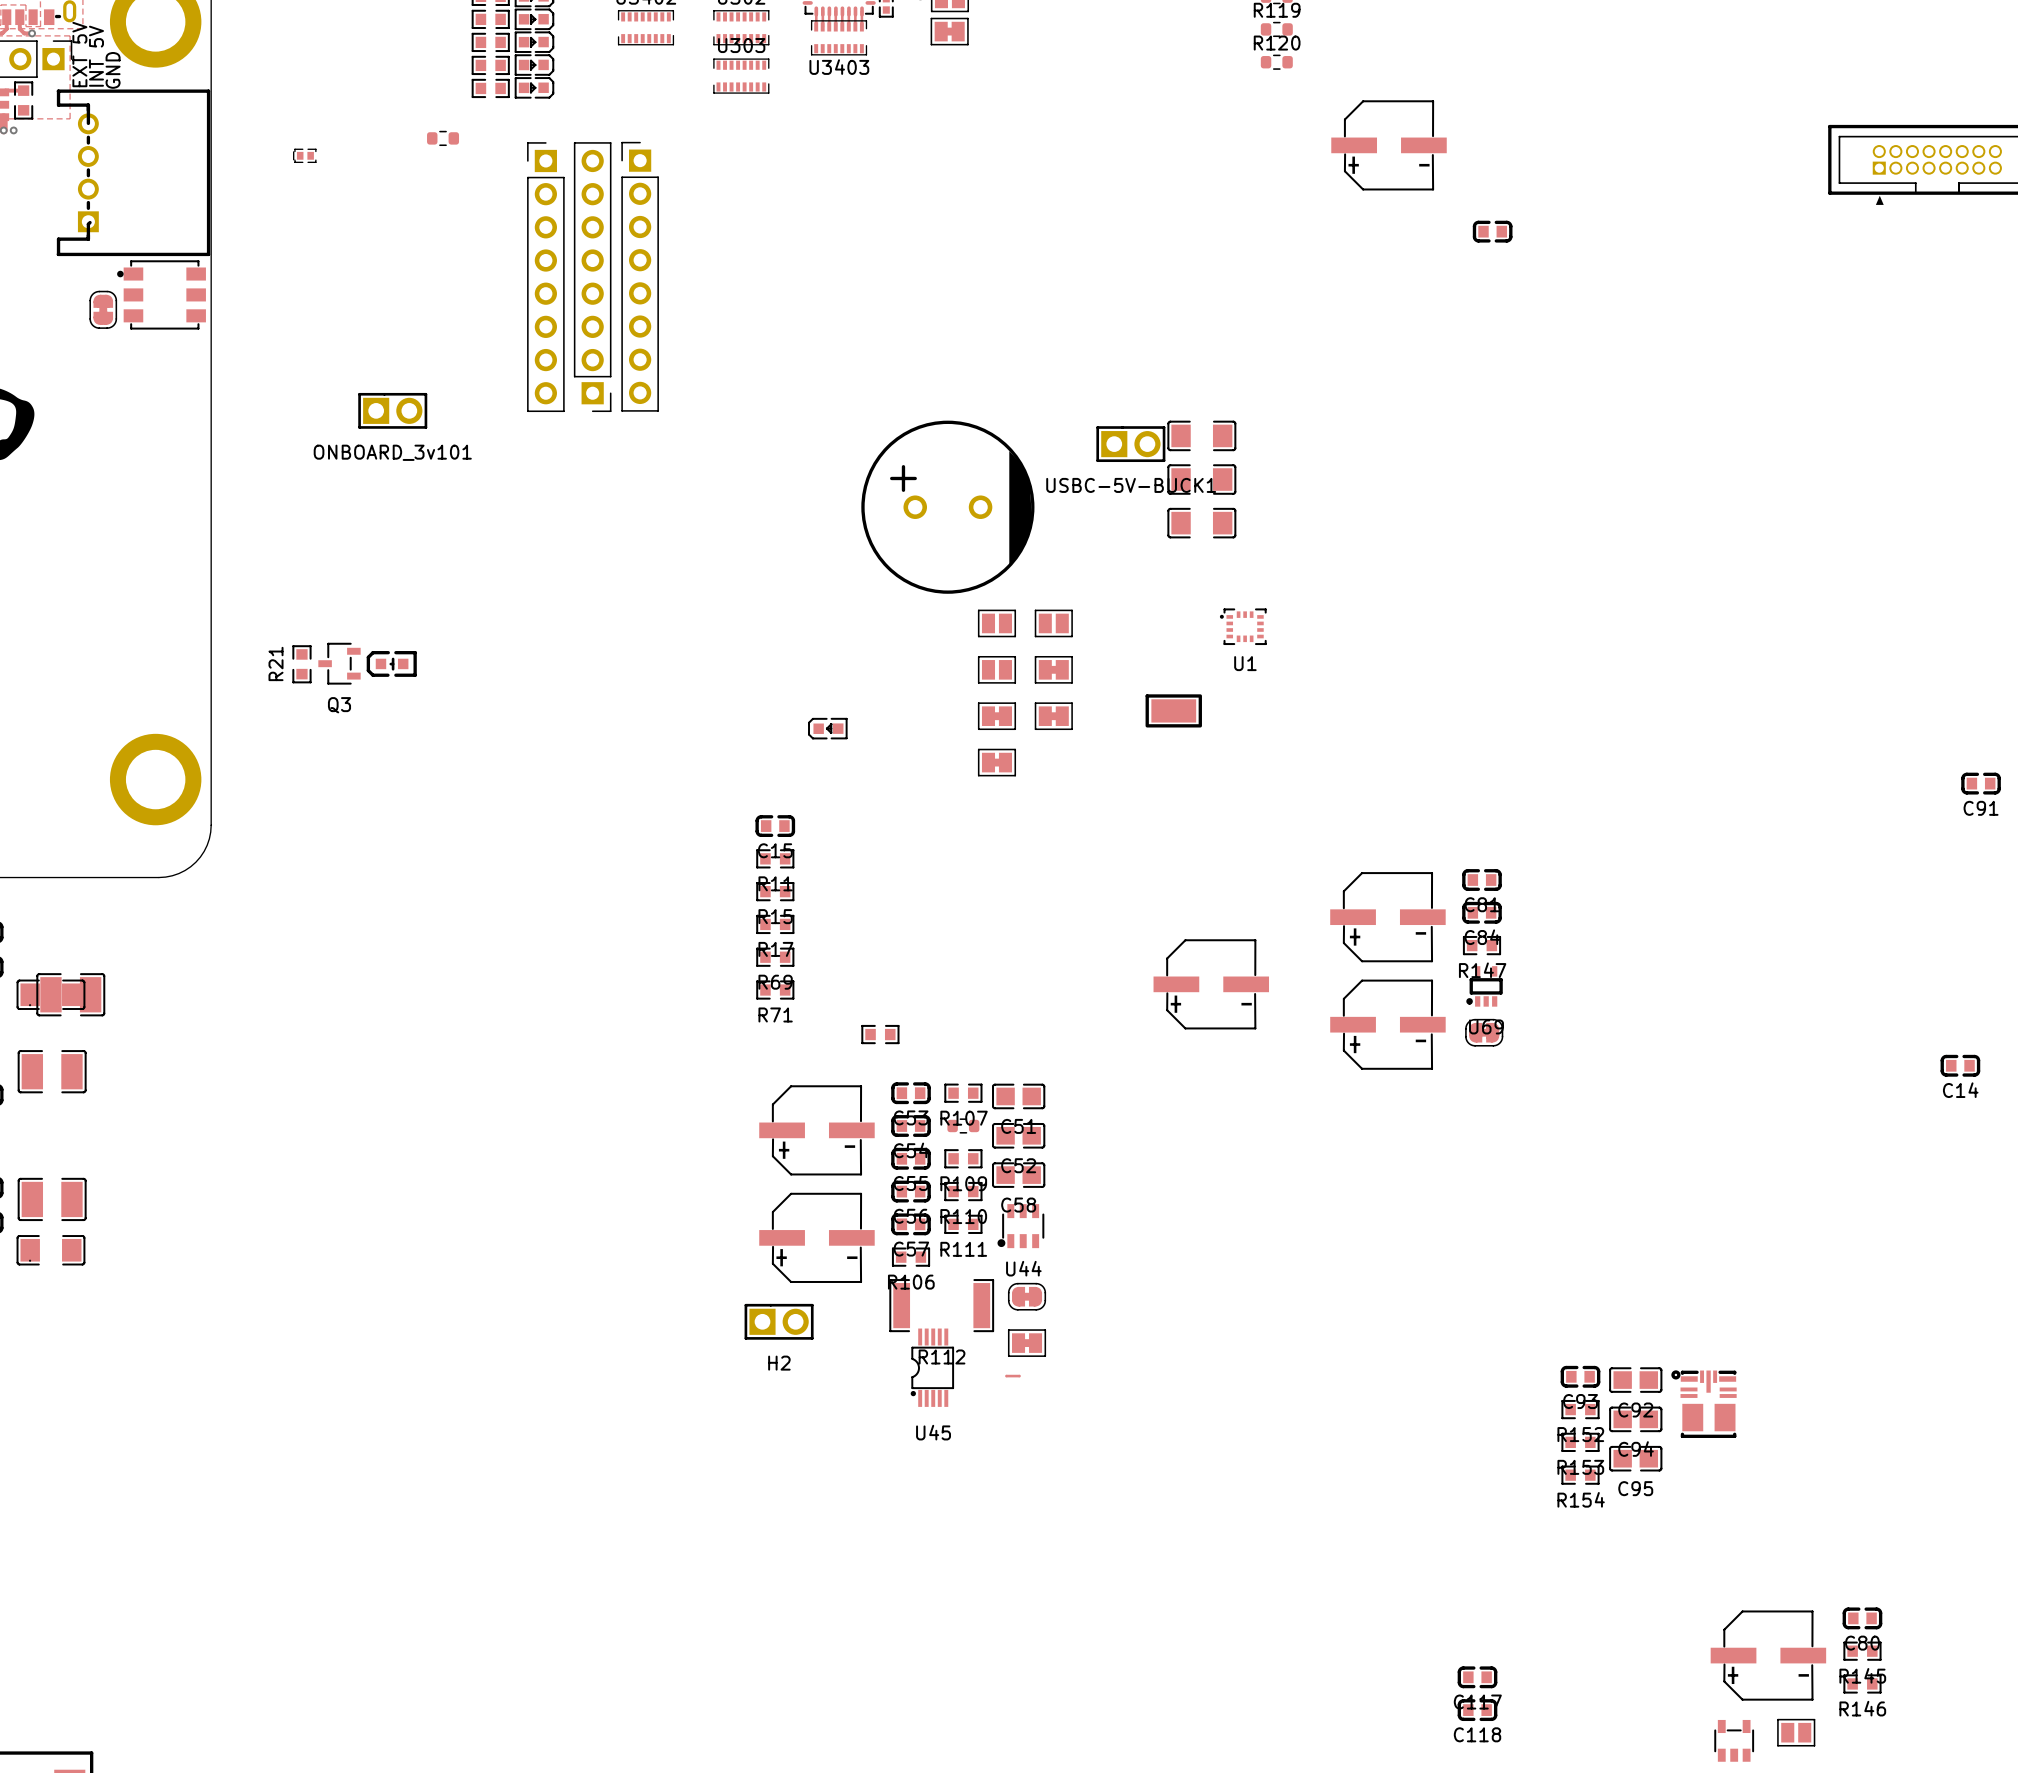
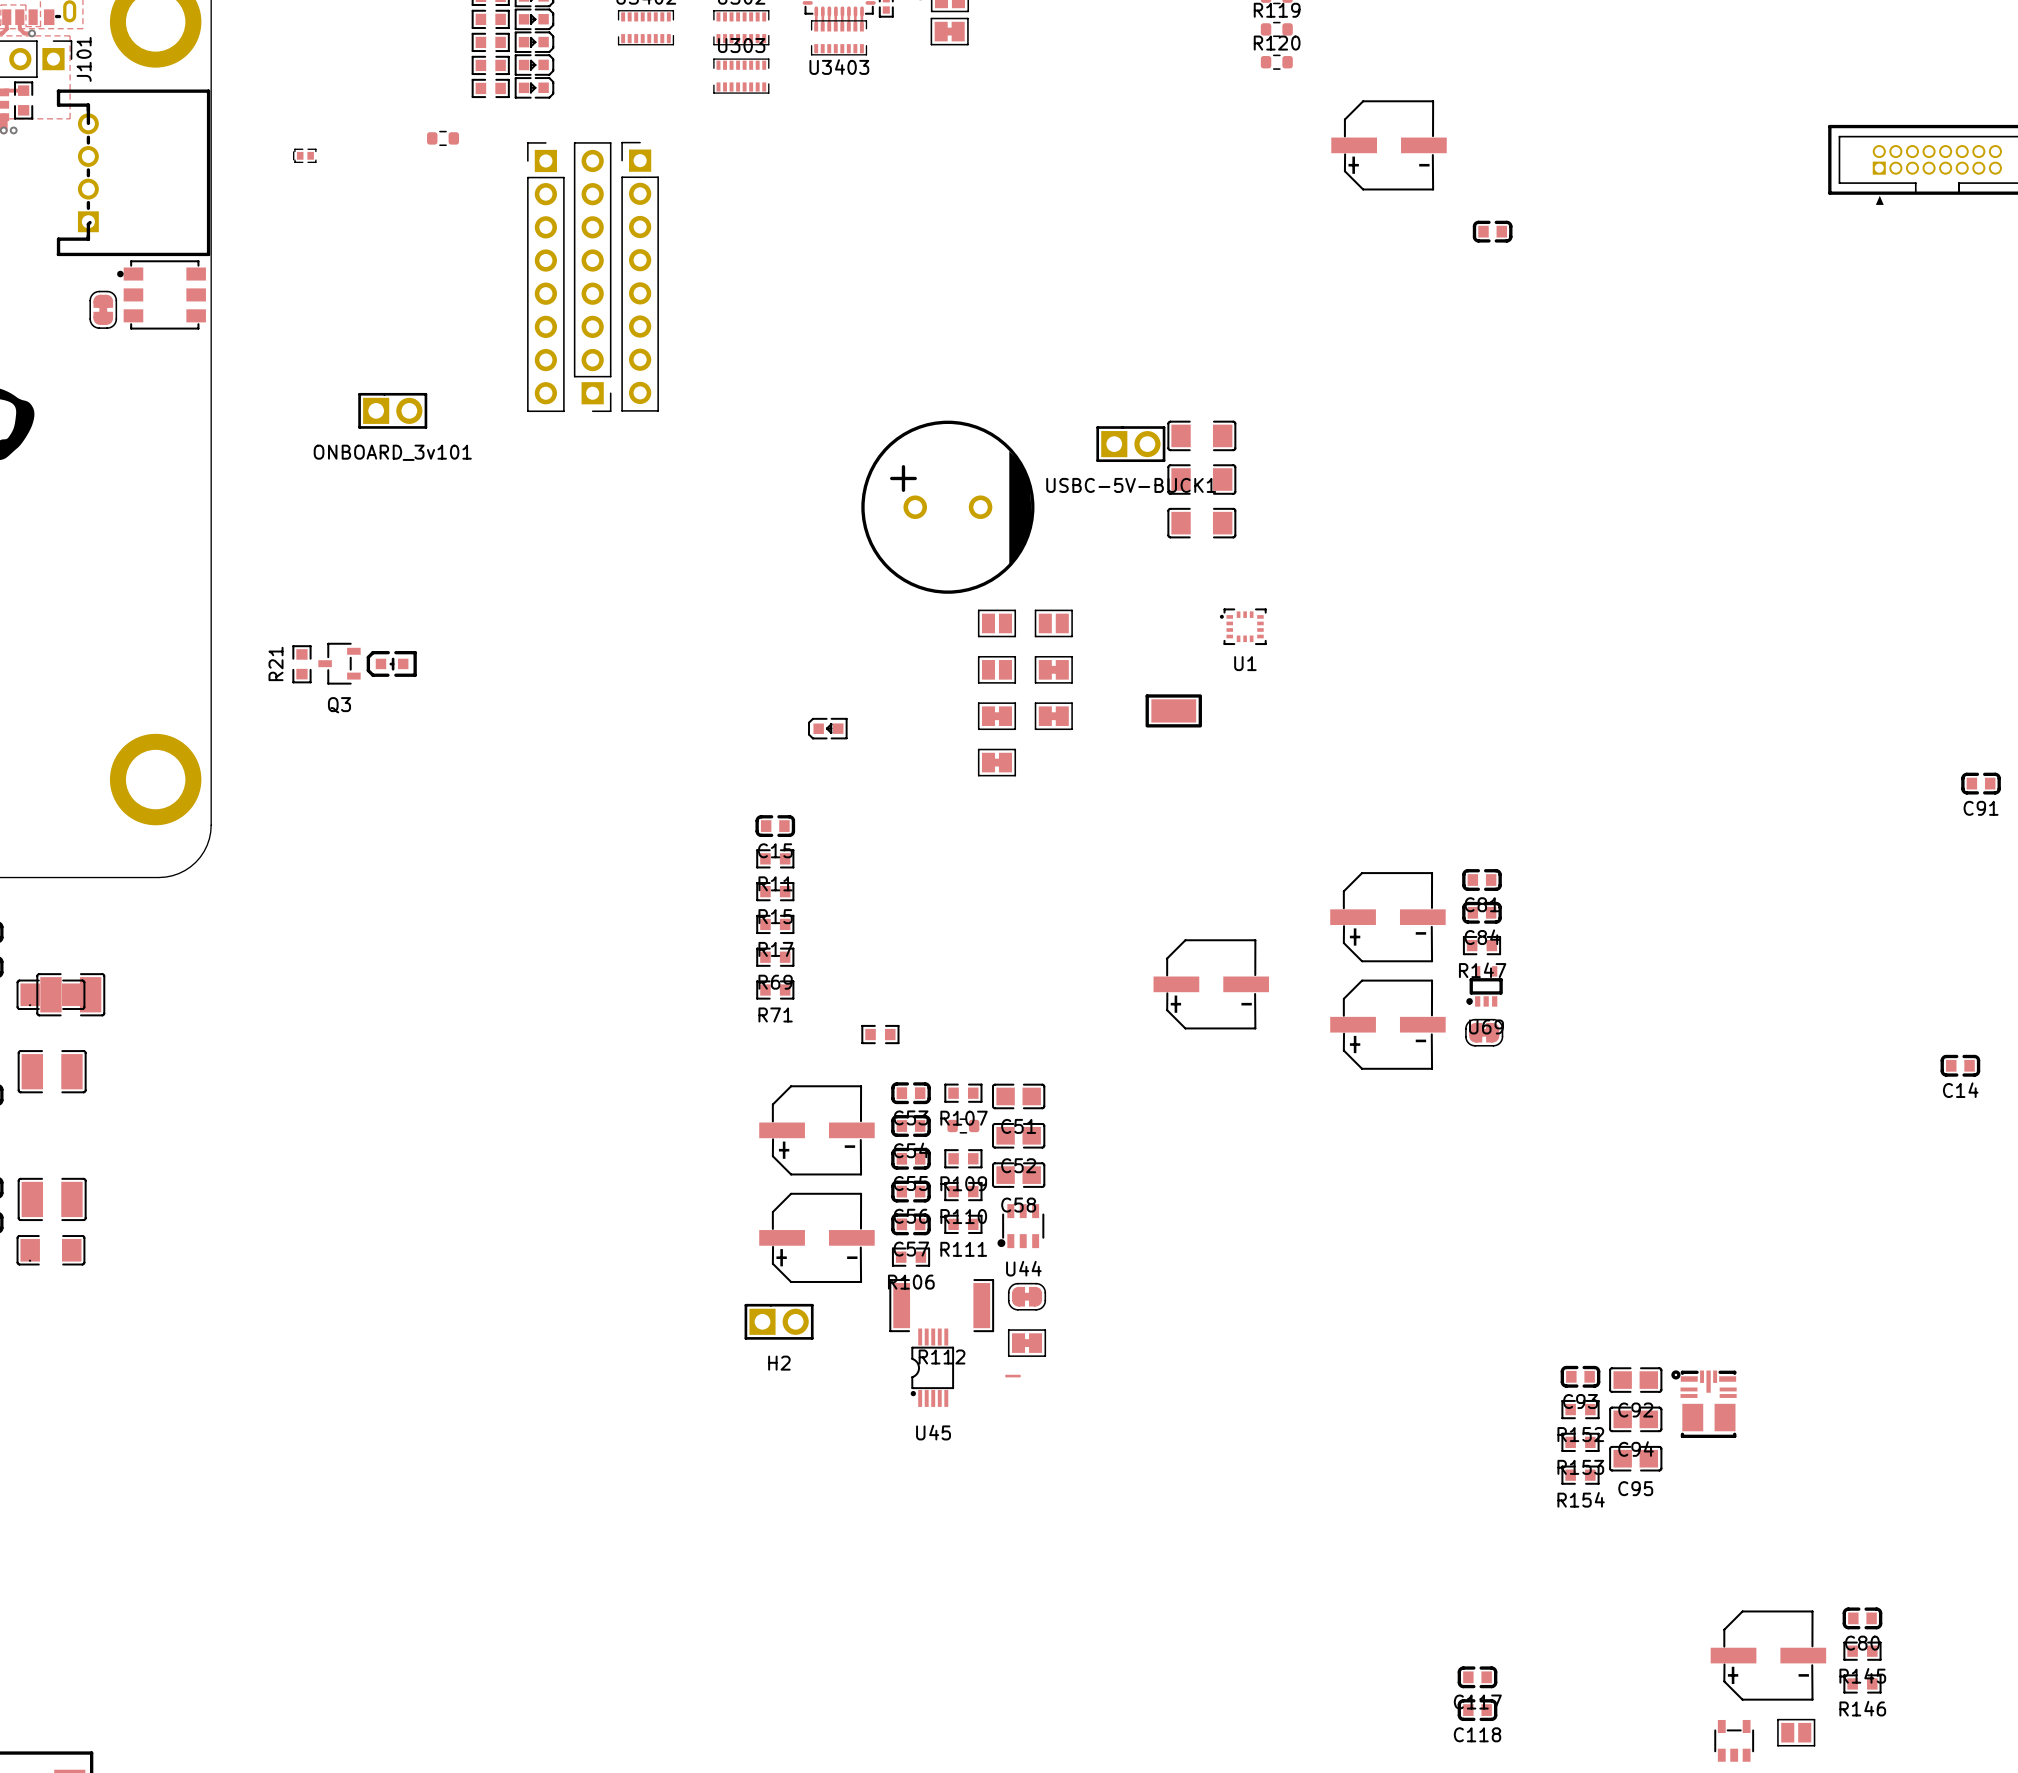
J101 text: EXT 5V (79, 54) -> none
J101 text: INT 5V (96, 56) -> none
J101 name: none -> J101 (84, 59)
J101 text: GND (113, 70) -> none

